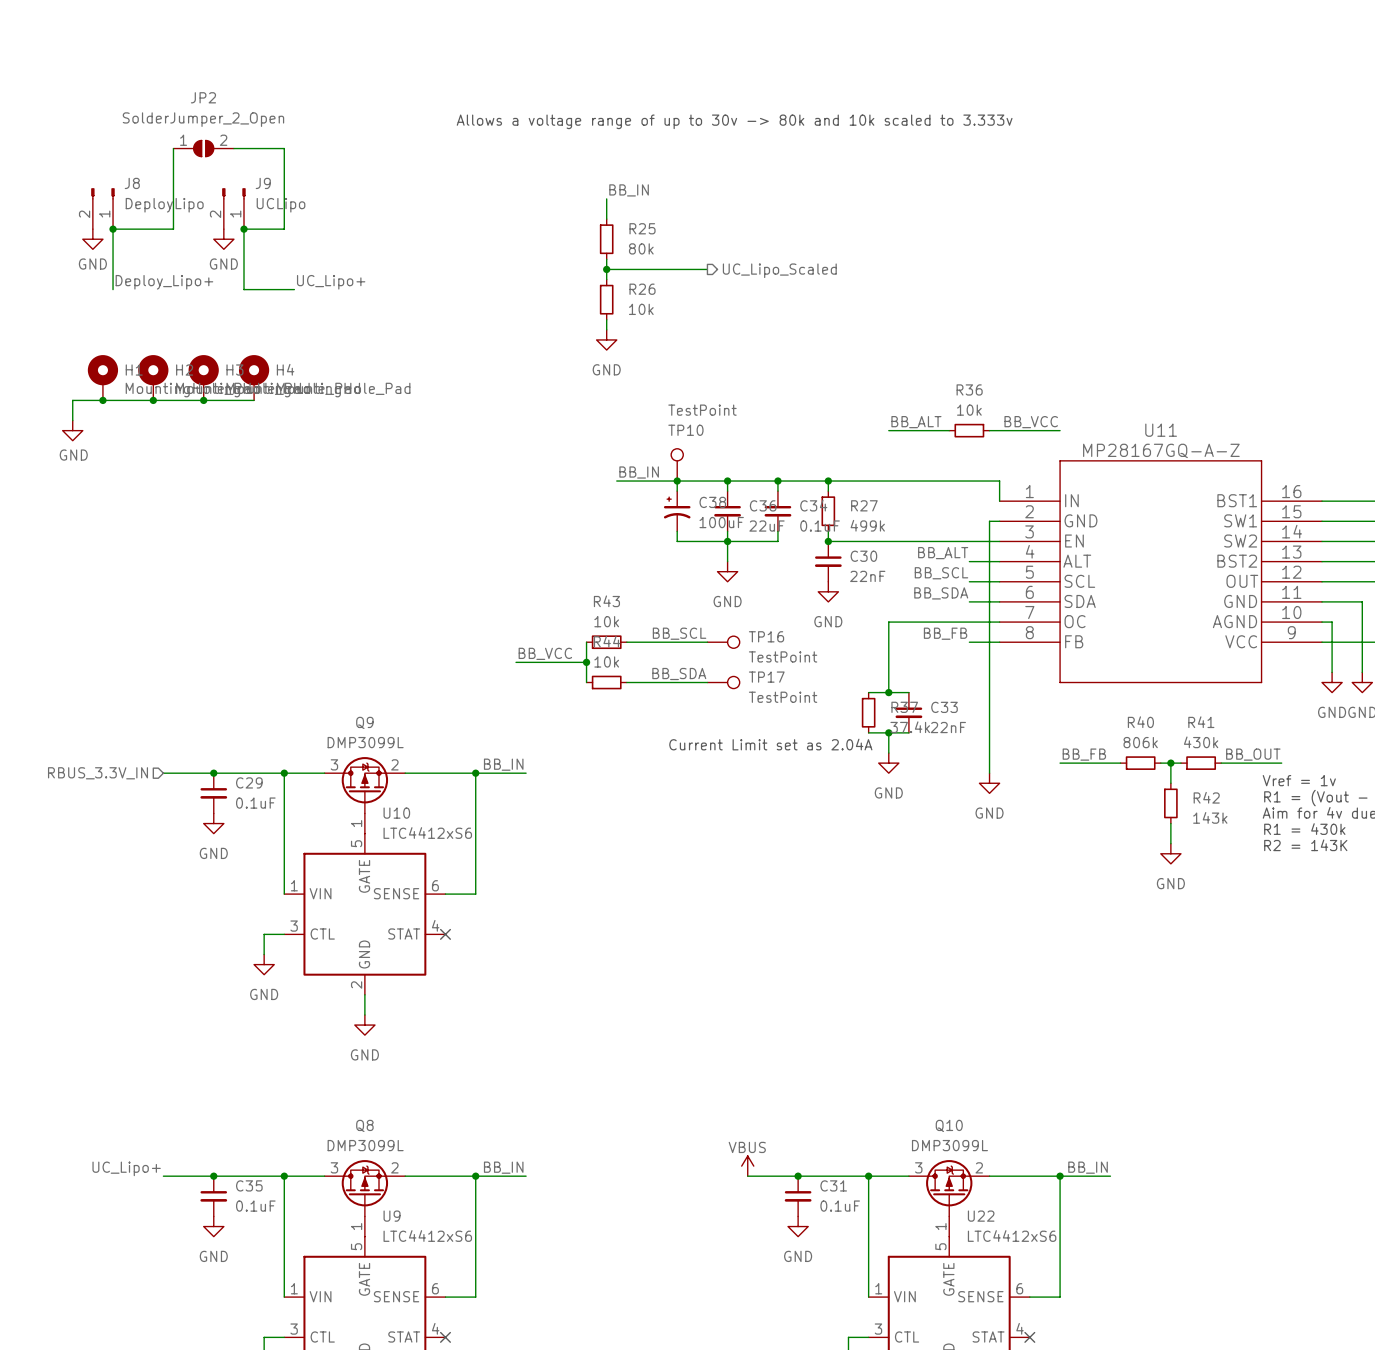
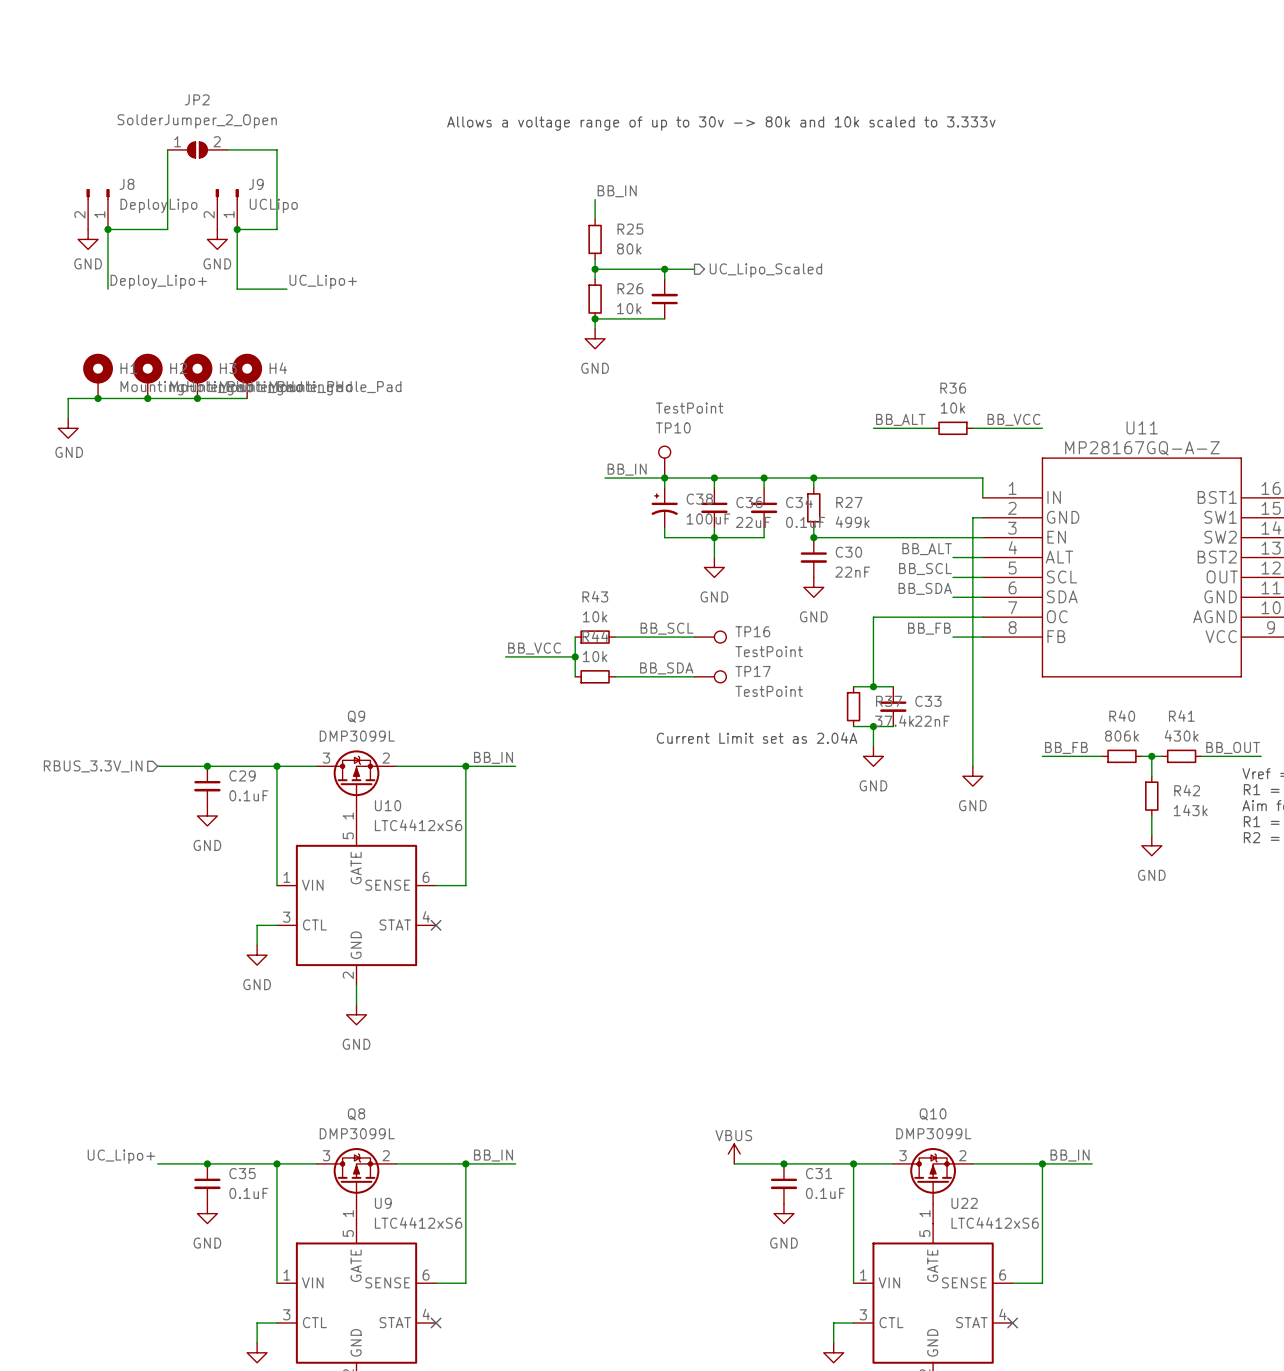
wire: none -> (664, 269) (664, 279)
junction: none -> (664, 269)
part: none -> (664, 299)
wire: none -> (595, 318) (664, 318)
junction: none -> (595, 318)

